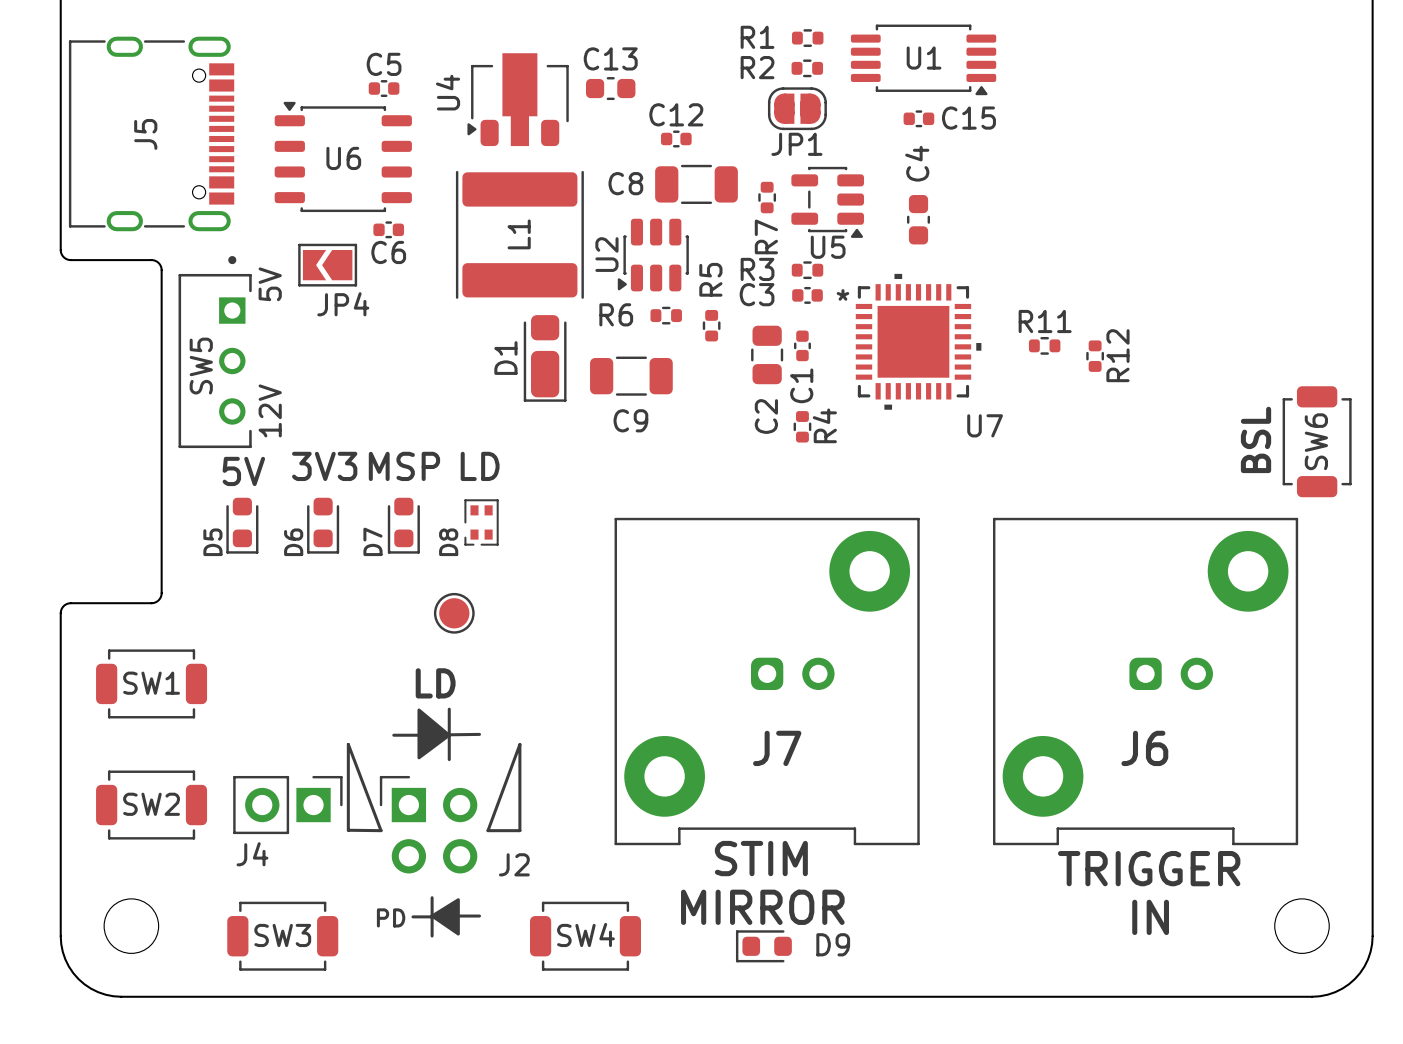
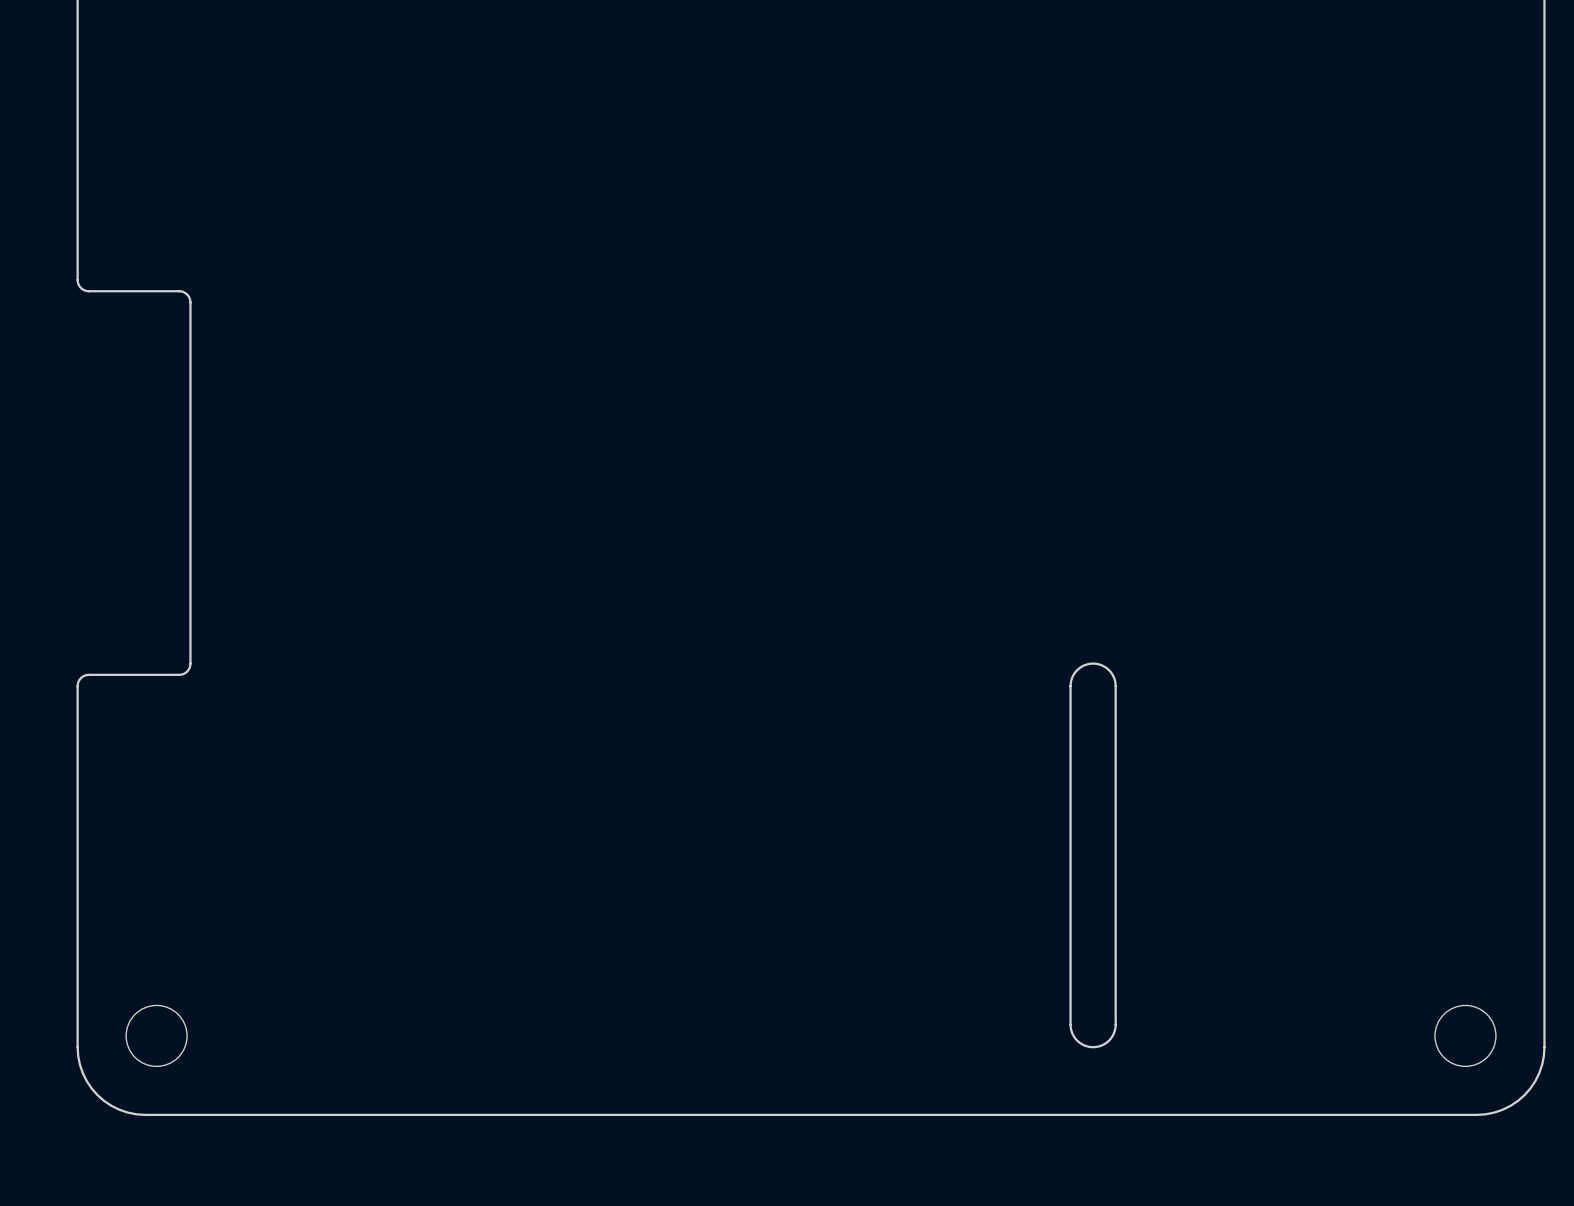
R1: (807, 38) -> none
U1: (923, 59) -> none
R2: (807, 68) -> none
C5: (384, 88) -> none
C13: (610, 88) -> none
U4: (518, 99) -> none
JP1: (797, 108) -> none
C15: (918, 118) -> none
J5: (151, 133) -> none
C12: (676, 138) -> none
U6: (343, 156) -> none
C8: (696, 184) -> none
R7: (767, 197) -> none
U5: (827, 202) -> none
C4: (918, 219) -> none
C6: (388, 229) -> none
L1: (519, 234) -> none
U2: (653, 255) -> none
JP4: (327, 265) -> none
R3: (807, 270) -> none
text: 5V (270, 284) -> none
C3: (807, 295) -> none
R6: (666, 315) -> none
R5: (711, 325) -> none
U7: (918, 341) -> none
C1: (802, 345) -> none
R11: (1044, 345) -> none
SW5: (215, 352) -> none
C2: (767, 354) -> none
R12: (1095, 356) -> none
D1: (545, 358) -> none
C9: (631, 376) -> none
text: 12V (270, 410) -> none
R4: (802, 426) -> none
text: BSL (1256, 439) -> none
SW6: (1317, 441) -> none
text: 3V3 (324, 466) -> none
text: MSP (404, 466) -> none
text: LD (480, 466) -> none
text: 5V (243, 471) -> none
D8: (481, 522) -> none
D5: (242, 525) -> none
D6: (323, 525) -> none
D7: (403, 525) -> none
part: (454, 613) -> none
board edge: none -> (1070, 686) (1070, 1027) (1073, 1035) (1079, 1042) (1087, 1046) (1096, 1047) (1104, 1044) (1111, 1038) (1115, 1024) (1115, 683) (1109, 670) (1101, 665) (1093, 663) (1084, 665) (1077, 670) (1072, 677) (1070, 686)
J7: (767, 681) -> none
J6: (1145, 681) -> none
SW1: (151, 683) -> none
text: LD (435, 683) -> none
drawing: [417, 708, 451, 760] -> none
line: (449, 709) (449, 759) -> none
line: (479, 734) (393, 735) -> none
line: (348, 744) (381, 830) (348, 830) (348, 744) -> none
line: (519, 744) (488, 830) (519, 830) (519, 744) -> none
SW2: (151, 805) -> none
J4: (287, 805) -> none
J2: (428, 824) -> none
text: STIM (761, 858) -> none
text: TRIGGER (1149, 868) -> none
line: (432, 897) (432, 936) -> none
drawing: [430, 898, 460, 936] -> none
text: MIRROR (762, 907) -> none
line: (412, 916) (432, 916) -> none
line: (459, 916) (479, 916) -> none
text: PD (391, 917) -> none
text: IN (1150, 917) -> none
SW3: (282, 936) -> none
SW4: (585, 936) -> none
D9: (763, 946) -> none

